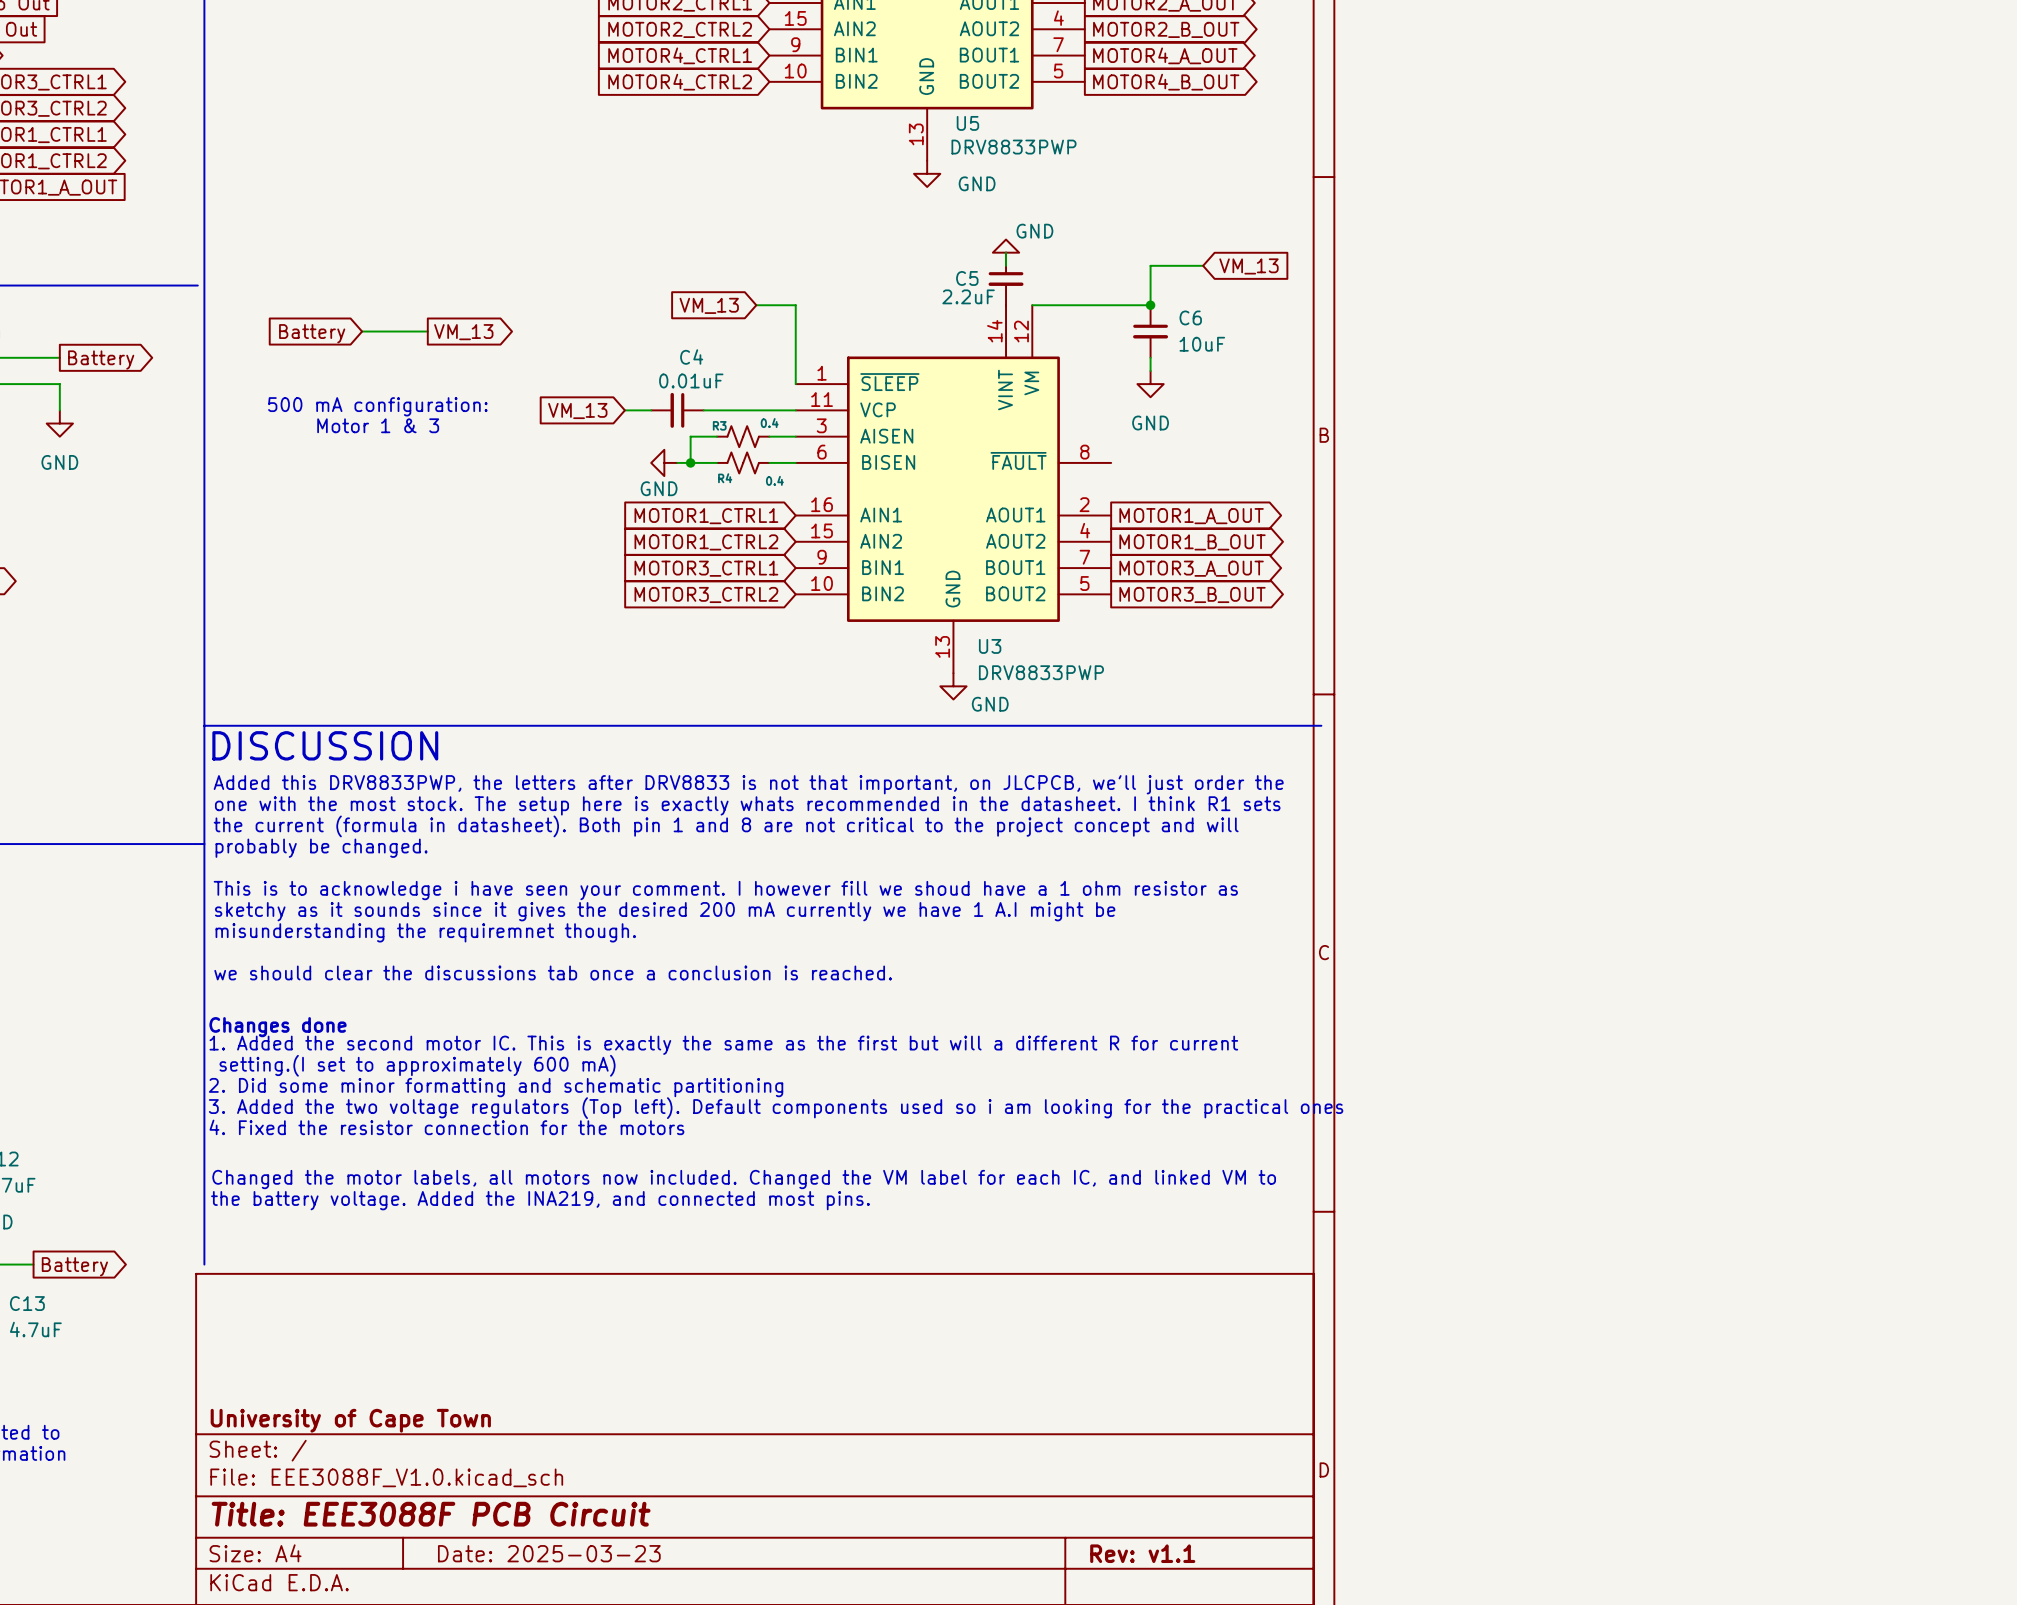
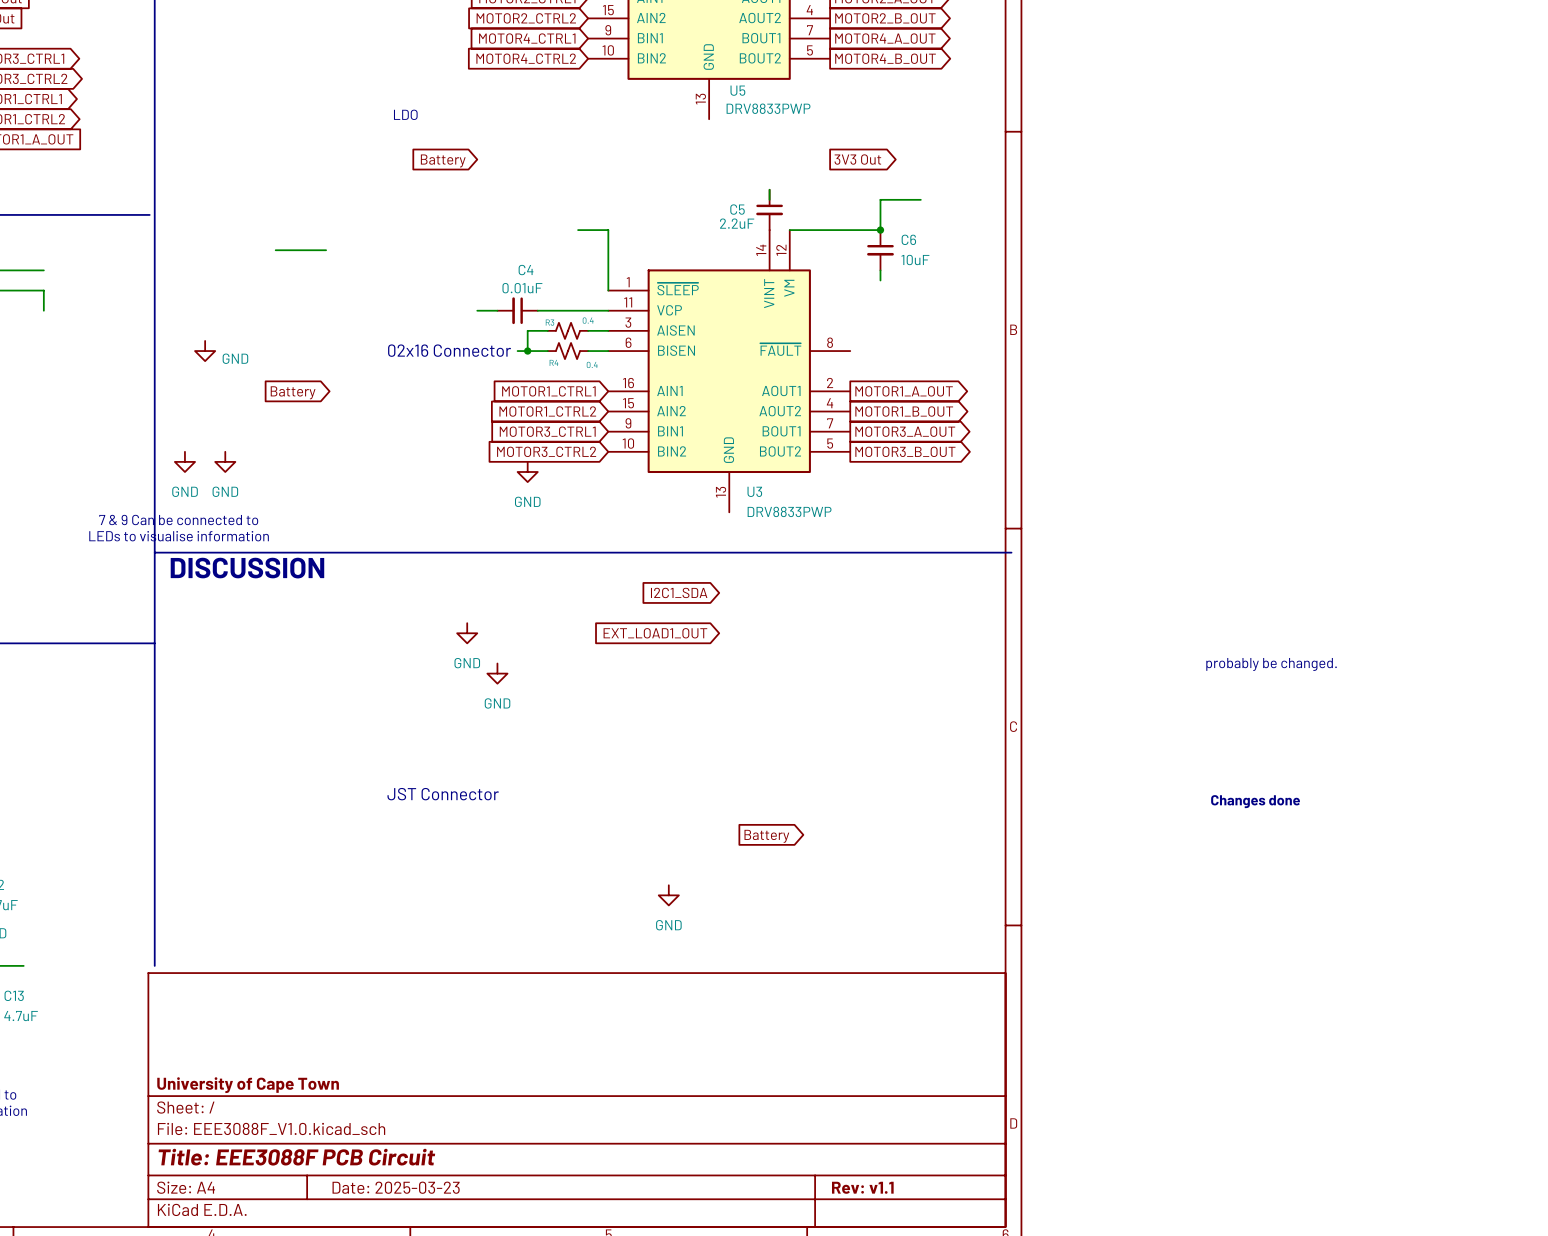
text: none -> LDO (405, 114)
power symbol: GND (927, 173) -> none
global label: none -> 3V3 Out (857, 159)
global label: none -> Battery (443, 160)
power symbol: GND (1006, 252) -> none
global label: VM_13 (1248, 266) -> none
global label: VM_13 (709, 305) -> none
global label: VM_13 (463, 332) -> none
global label: Battery (312, 333) -> none
global label: Battery (101, 360) -> none
power symbol: GND (1150, 384) -> none
text: 500 mA configuration: (377, 406) -> none
global label: VM_13 (577, 411) -> none
power symbol: GND (59, 423) -> none
text: Motor 1 & 3 (378, 425) -> none
power symbol: none -> GND (205, 351)
text: none -> 02x16 Connector (449, 350)
power symbol: GND (664, 462) -> none
global label: none -> Battery (293, 392)
power symbol: none -> GND (184, 461)
power symbol: none -> GND (225, 461)
power symbol: none -> GND (527, 472)
text: none -> 7 & 9 Can be connected to (178, 519)
power symbol: GND (953, 686) -> none
text: none -> LEDs to visualise information (179, 536)
global label: none -> I2C1_SDA (679, 592)
text: Added this DRV8833PWP, the letters after DRV8833 is not that important, on JLCPCB, we'll just order the (748, 784) -> none
text: one with the most stock. The setup here is exactly whats recommended in the datasheet. I think R1 sets (747, 805) -> none
text: the current (formula in datasheet). Both pin 1 and 8 are not critical to the project concept and will (726, 826) -> none
power symbol: none -> GND (467, 633)
global label: none -> EXT_LOAD1_OUT (655, 633)
text: probably be changed. (321, 848) -> none
text: none -> probably be changed. (1271, 664)
power symbol: none -> GND (497, 673)
text: This is to acknowledge i have seen your comment. I however fill we shoud have a 1 ohm resistor as (725, 890) -> none
text: sketchy as it sounds since it gives the desired 200 mA currently we have 1 A.I might be (665, 911) -> none
text: misunderstanding the requiremnet though. (425, 932) -> none
text: we should clear the discussions tab once a conclusion is reached. (553, 972) -> none
text: Changes done (277, 1027) -> none
text: none -> JST Connector (443, 794)
text: 1. Added the second motor IC. This is exactly the same as the first but will a different R for current (723, 1045) -> none
text: none -> Changes done (1255, 801)
text: setting.(I set to approximately 600 mA) (417, 1065) -> none
text: 2. Did some minor formatting and schematic partitioning (496, 1087) -> none
global label: none -> Battery (766, 836)
text: 3. Added the two voltage regulators (Top left). Default components used so i am looking for the practical ones (776, 1108) -> none
text: 4. Fixed the resistor connection for the motors (446, 1127) -> none
power symbol: none -> GND (668, 895)
text: Changed the motor labels, all motors now included. Changed the VM label for each IC, and linked VM to (744, 1179) -> none
text: the battery voltage. Added the INA219, and connected most pins. (540, 1200) -> none
global label: Battery (74, 1266) -> none

